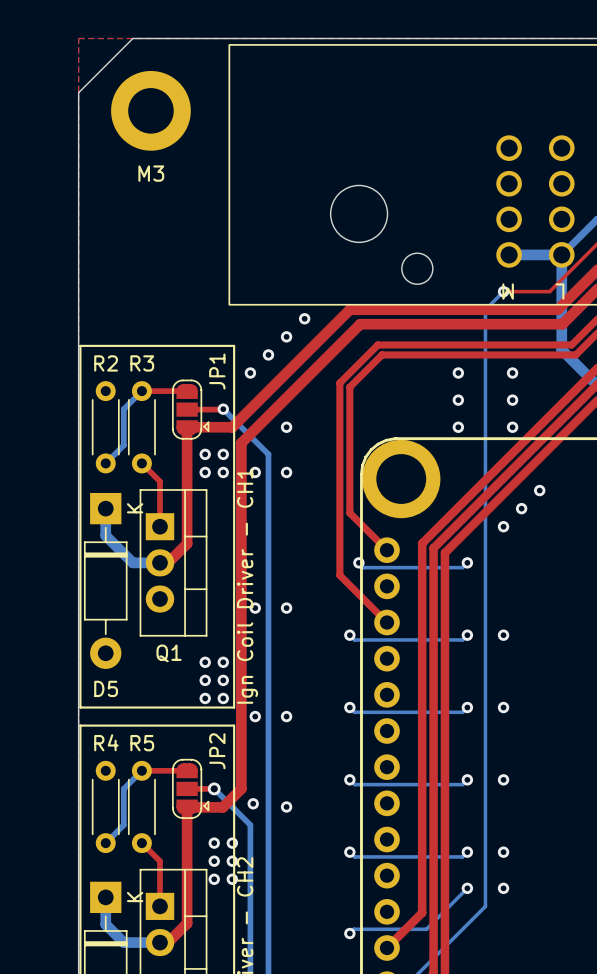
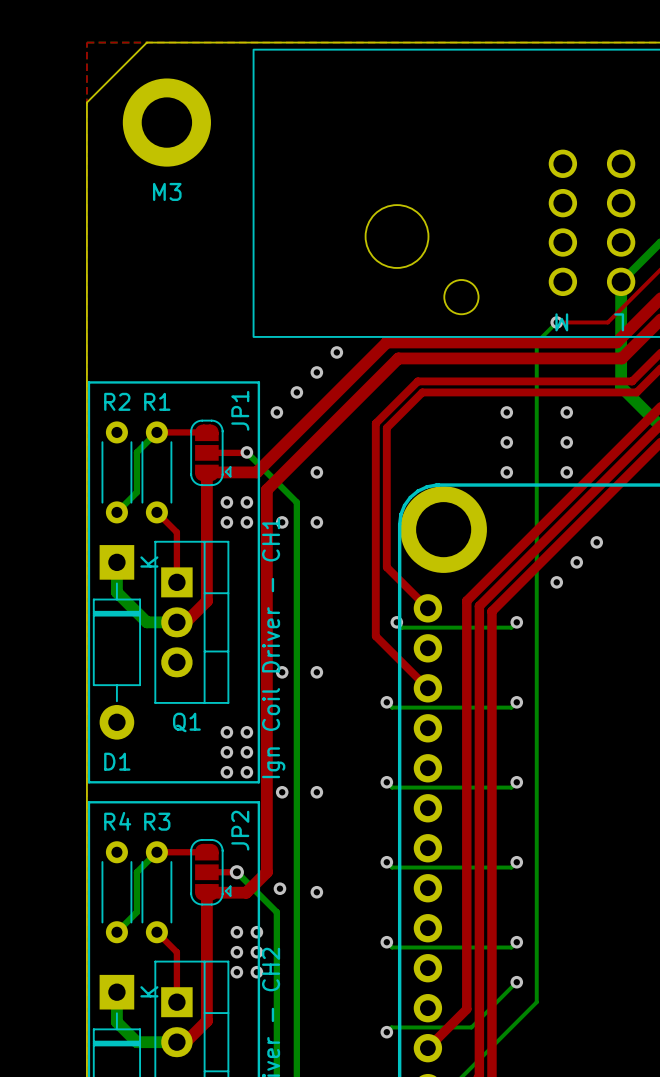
bottom track: (509, 254) (561, 254) -> none
R3 name: R3 (142, 363) -> R1 (157, 401)
via: (503, 635) -> none
D5 name: D5 (106, 688) -> D1 (117, 761)
via: (503, 707) -> none
R5 name: R5 (142, 743) -> R3 (157, 821)
via: (503, 779) -> none
via: (503, 852) -> none
via: (503, 888) -> none

